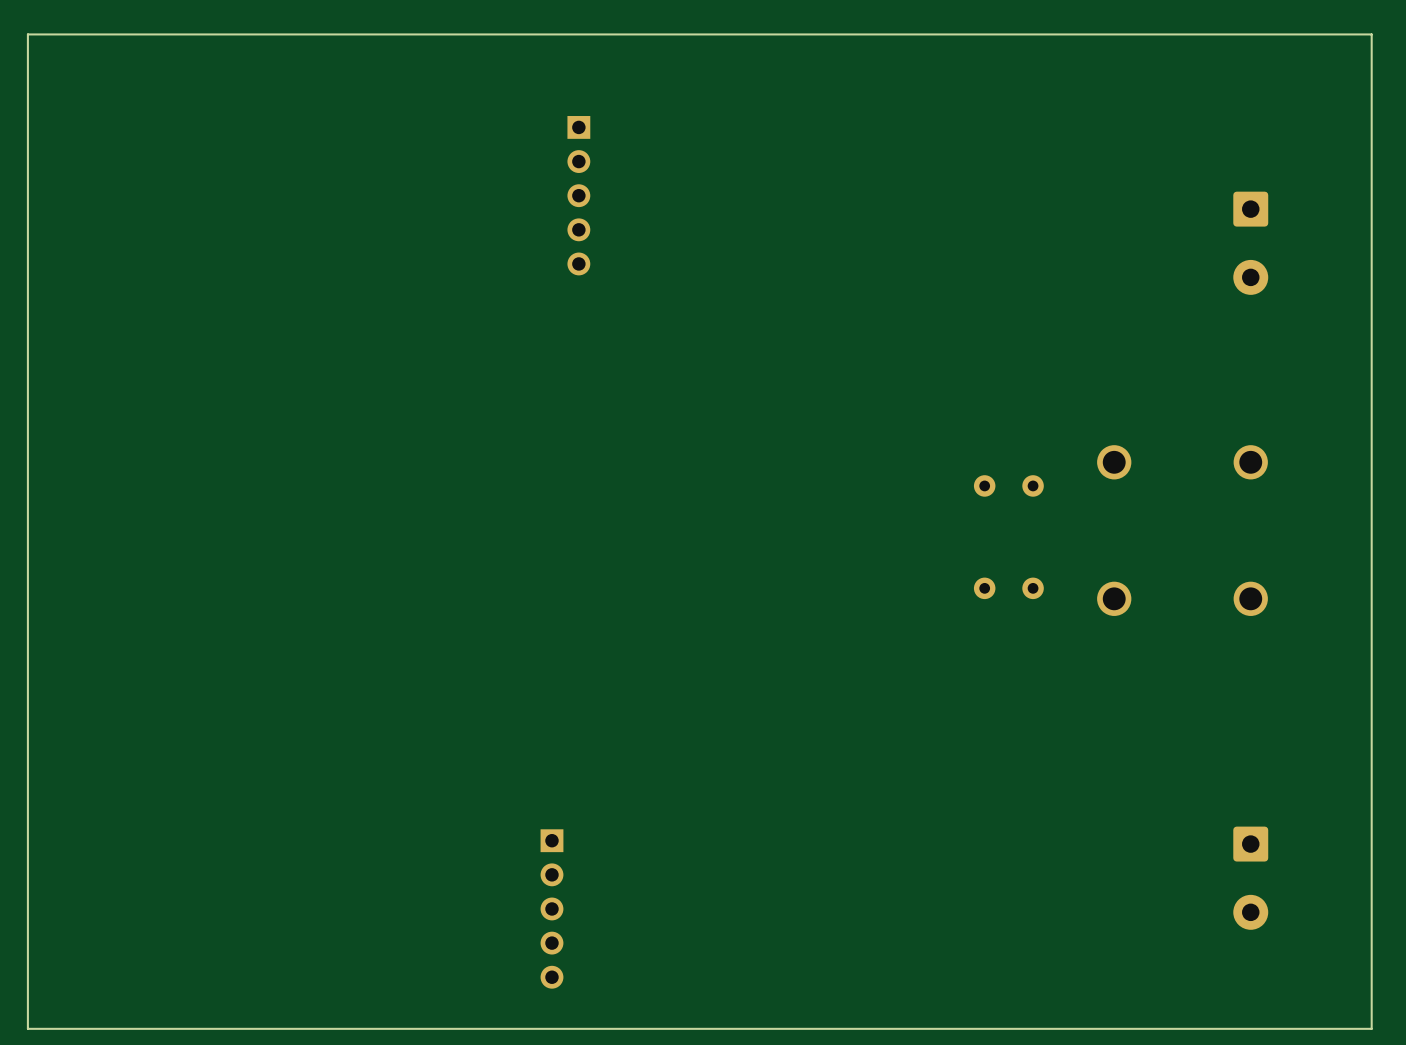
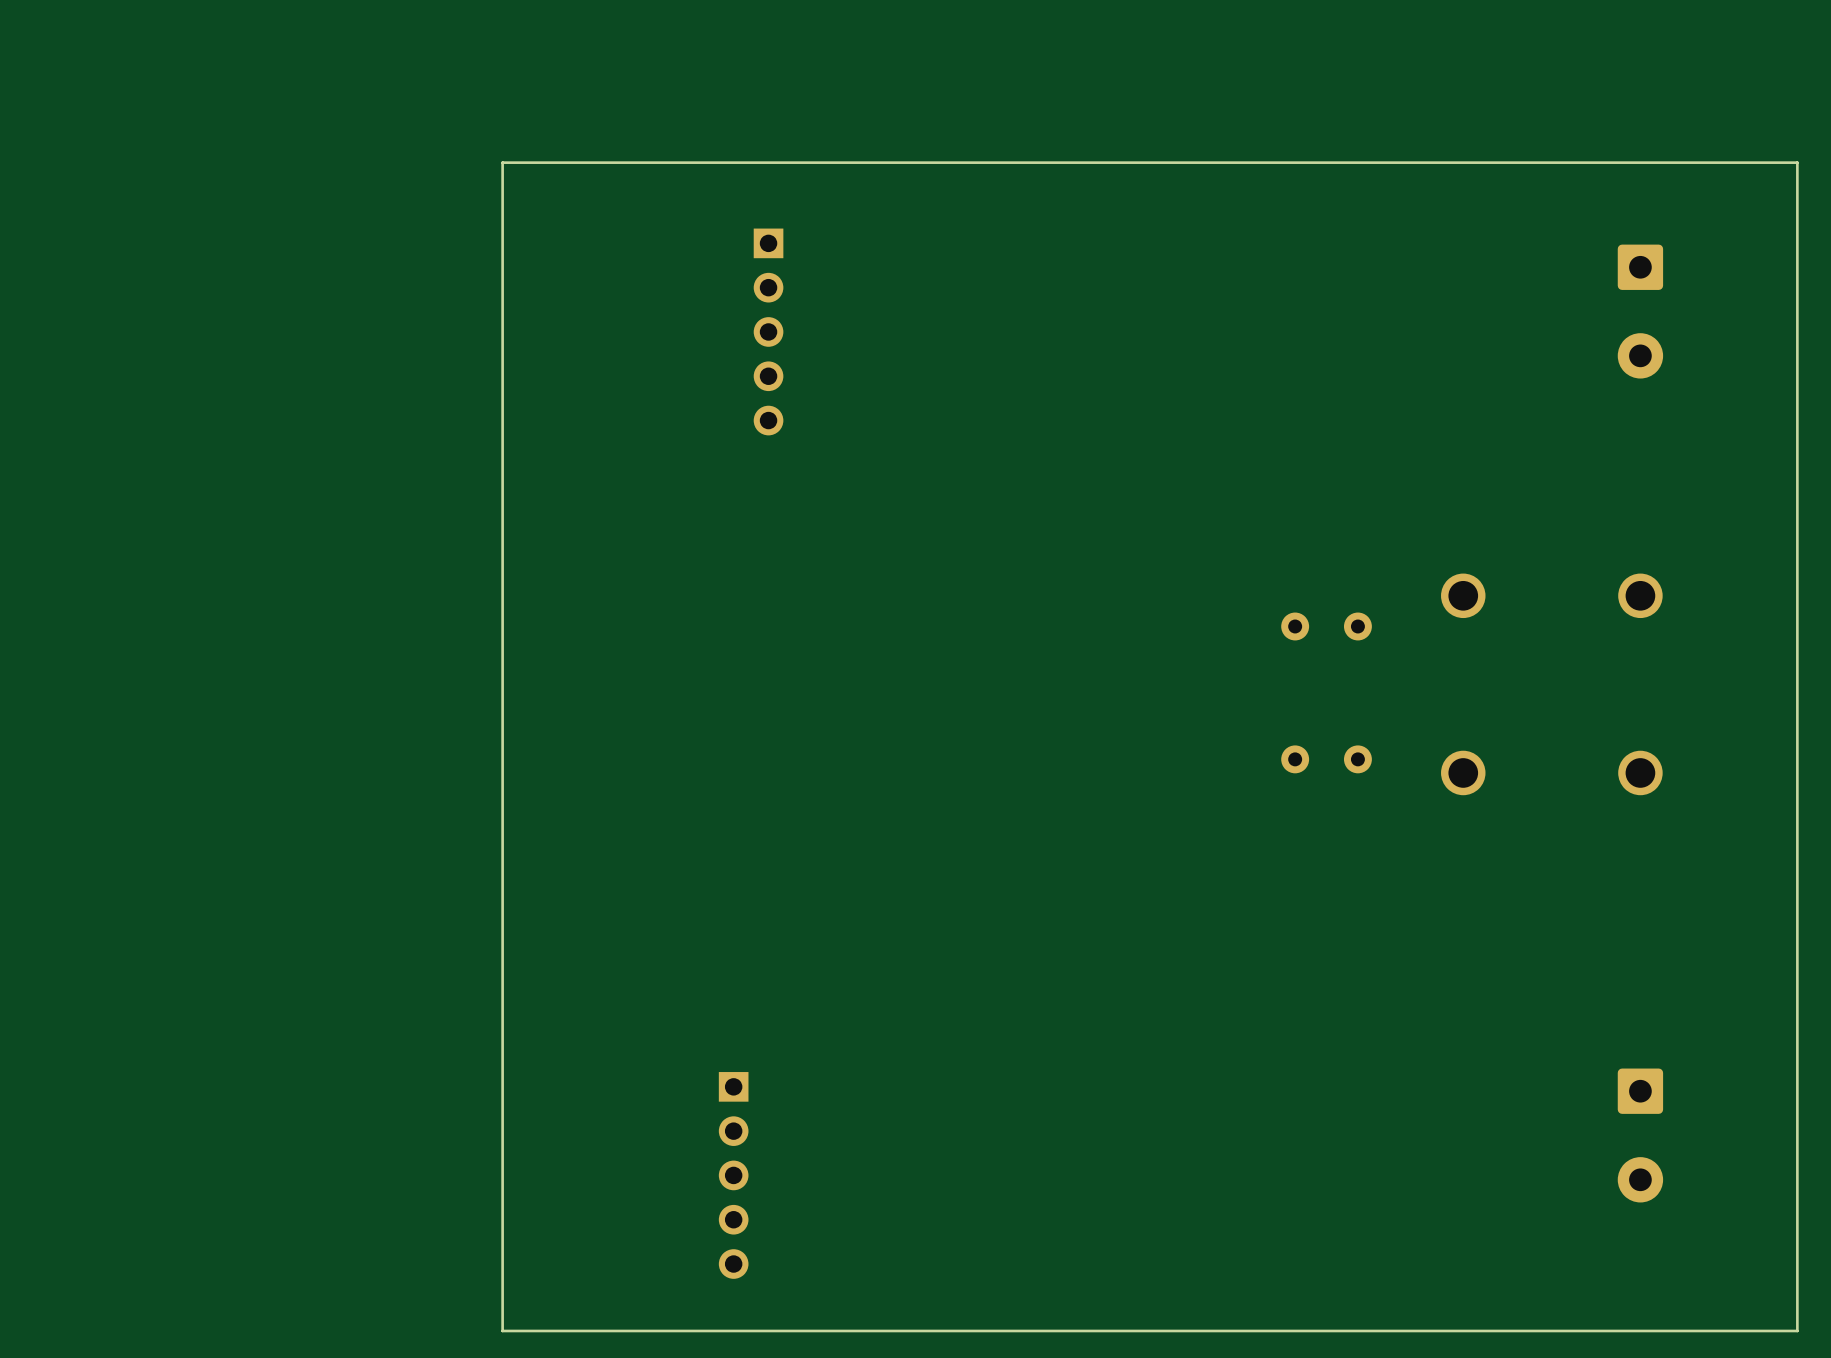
board edge: (1371, 128) (1371, 34) (27, 34) (27, 1028) (373, 1028) -> (1797, 162) (502, 162) (502, 1330)
part position: (578, 195) -> (768, 331)

